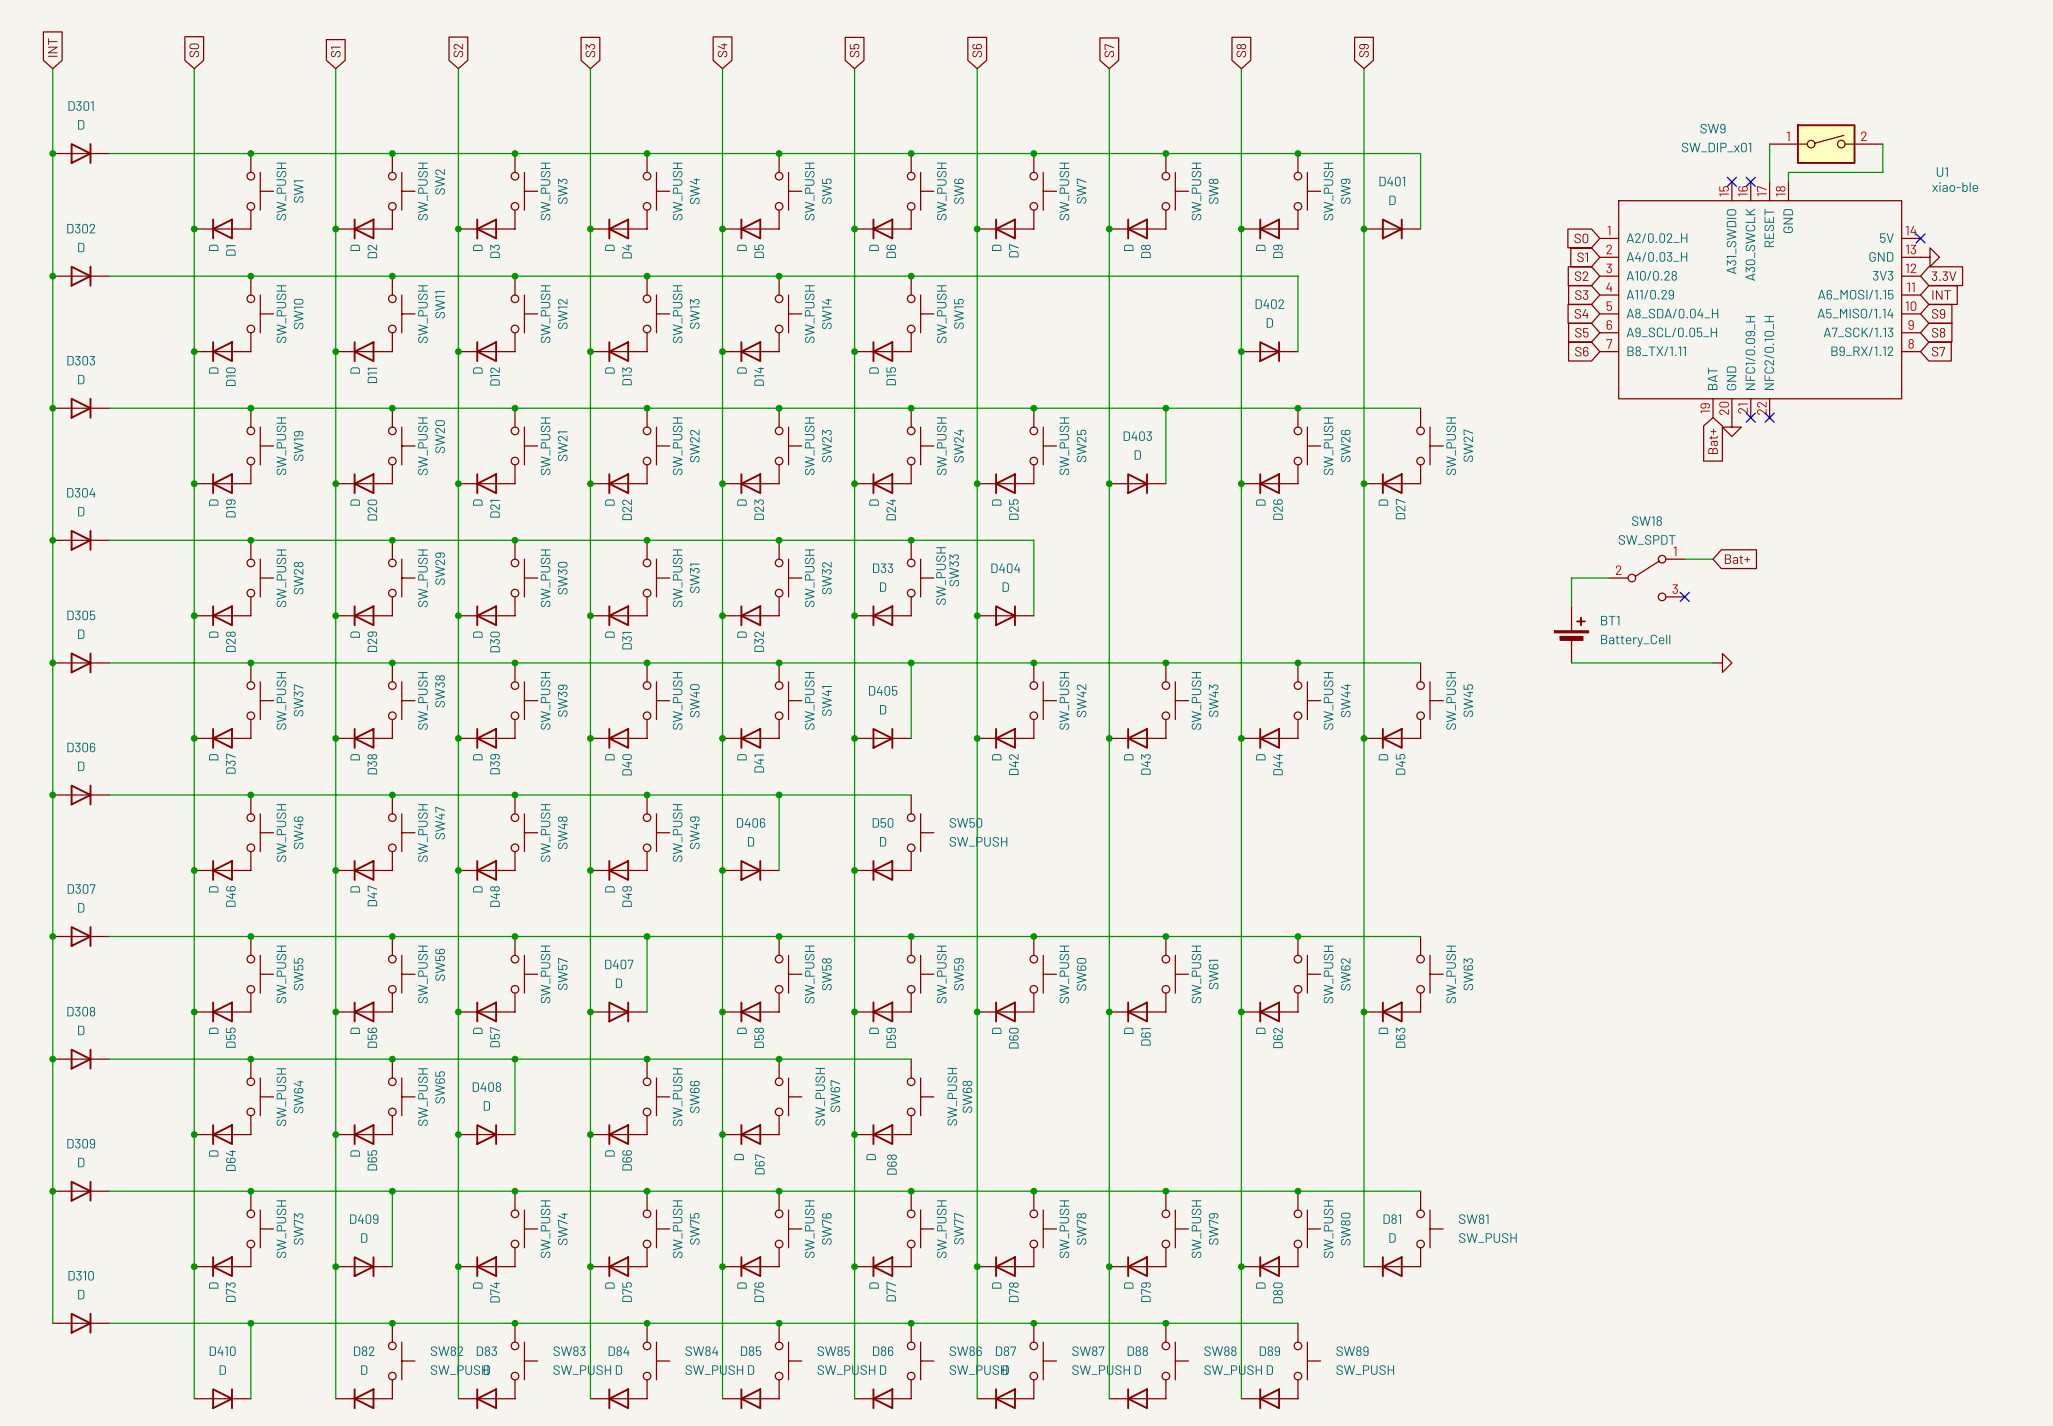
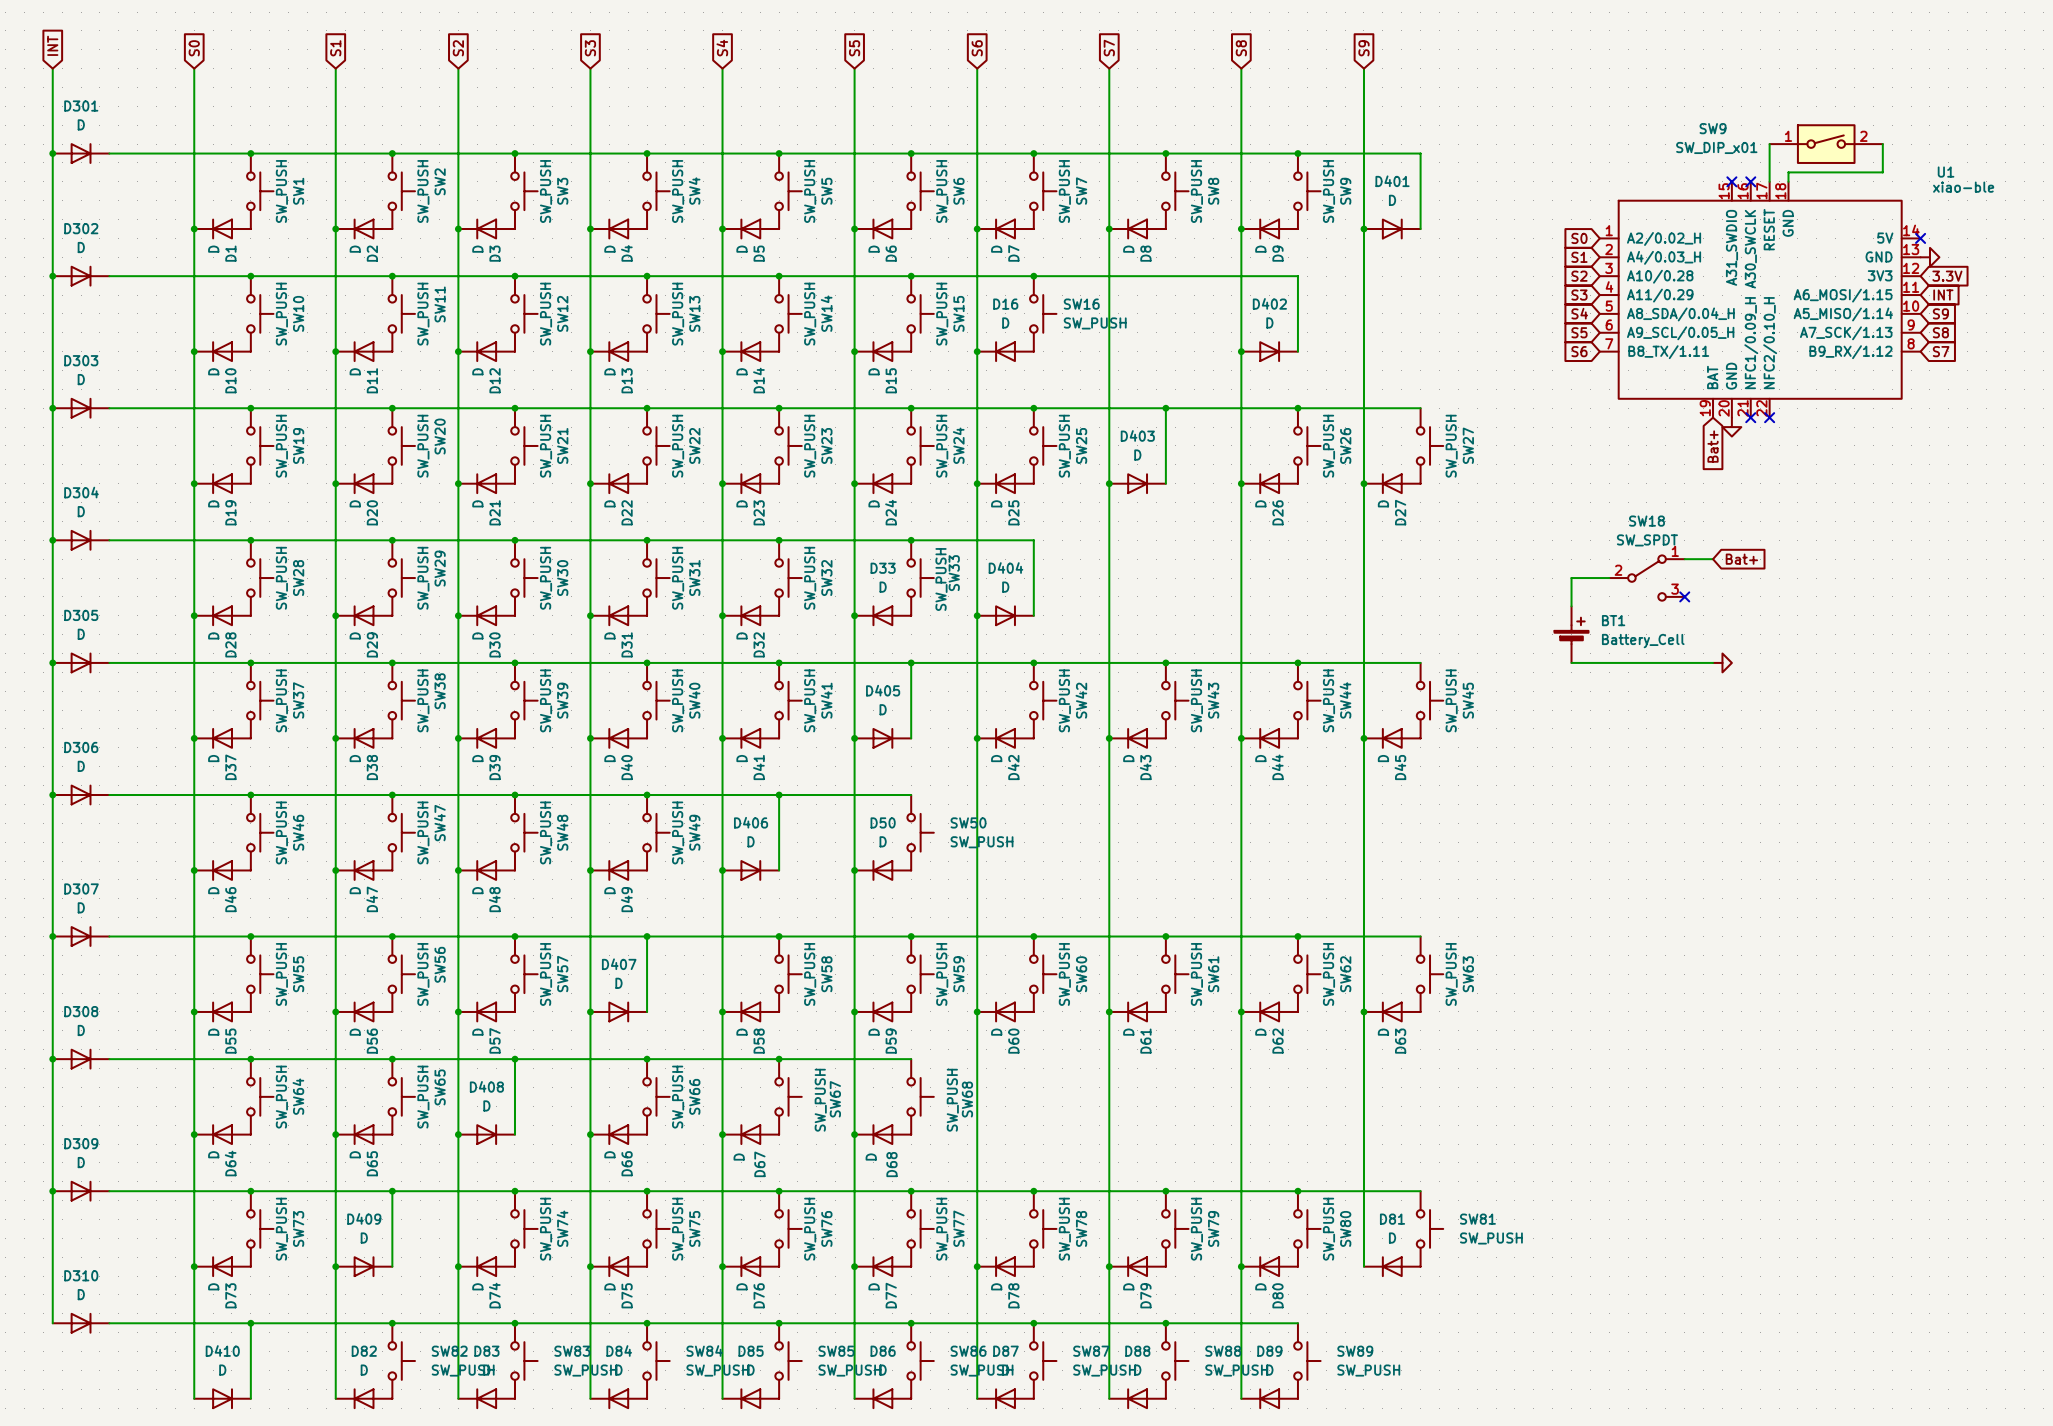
junction: none -> (1033, 276)
SW16: none -> SW_PUSH (1043, 313)
junction: none -> (977, 351)
D16: none -> D (1005, 351)

